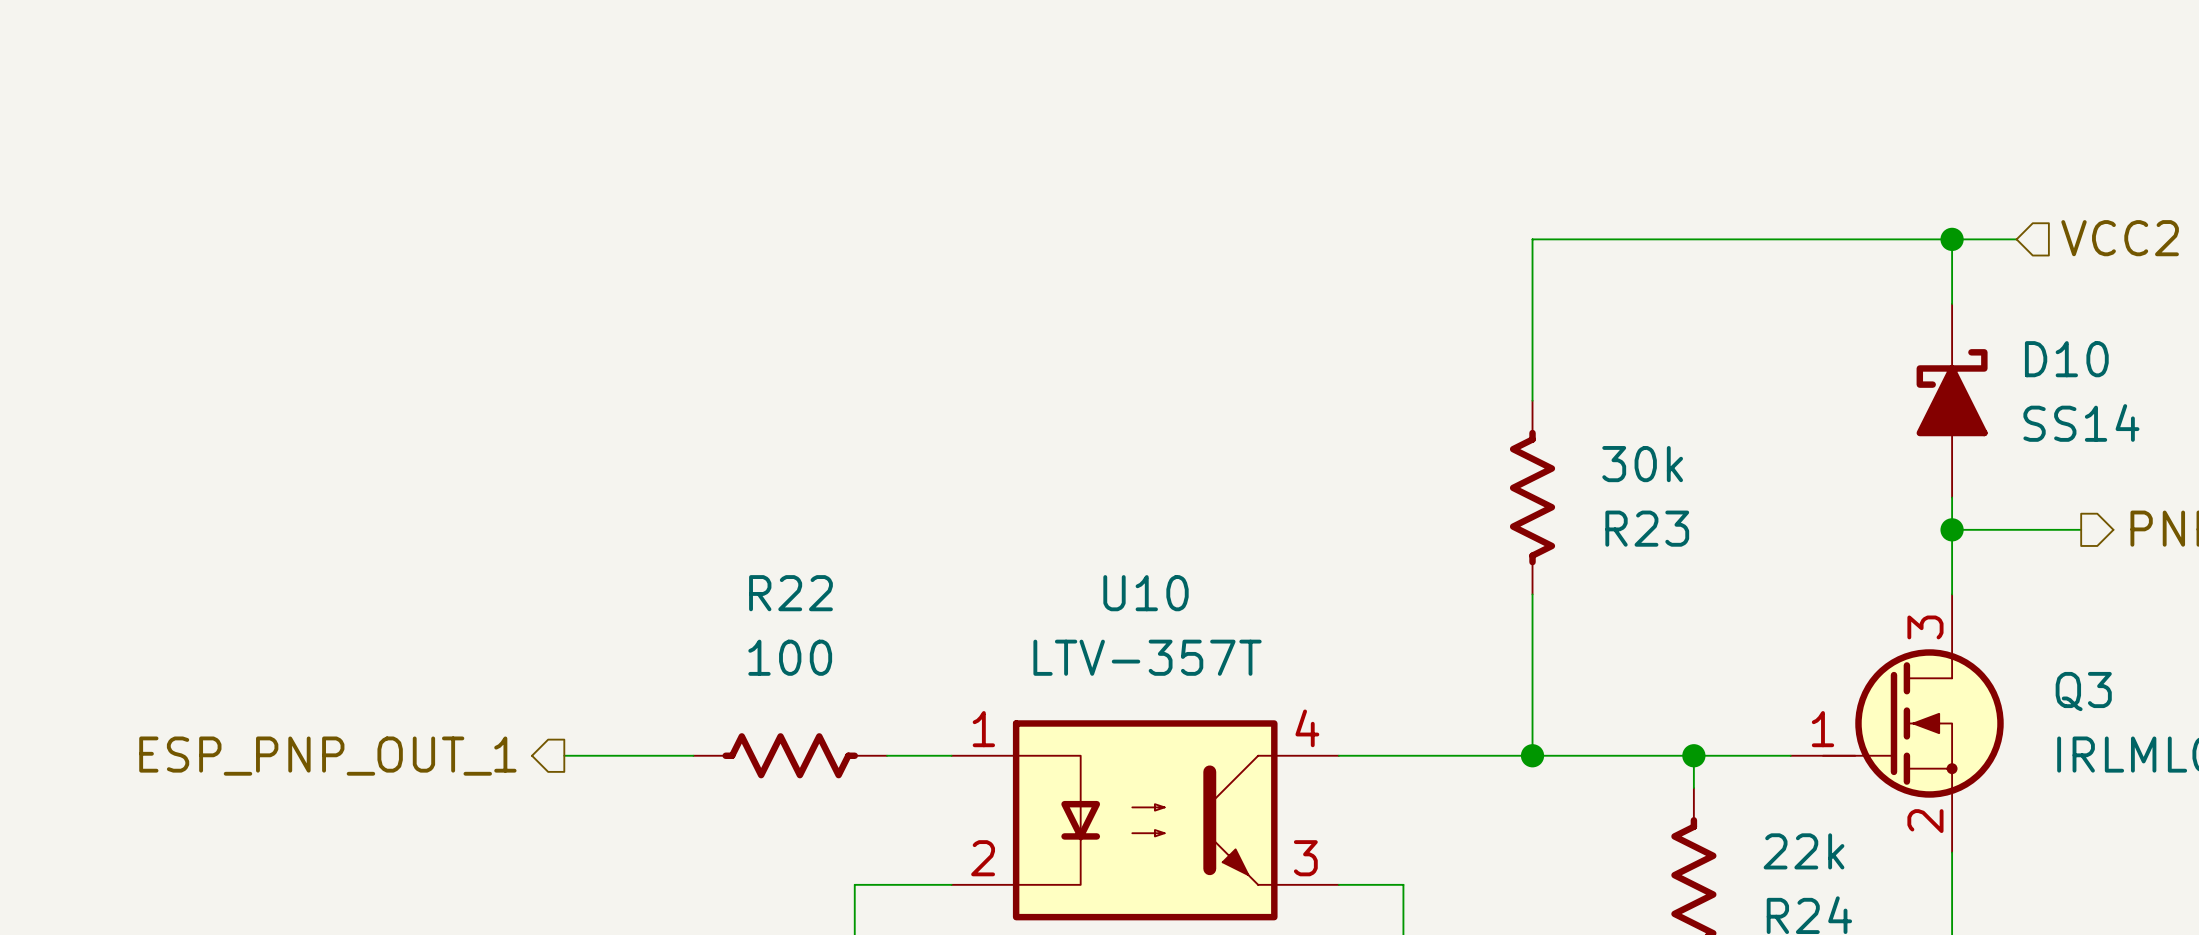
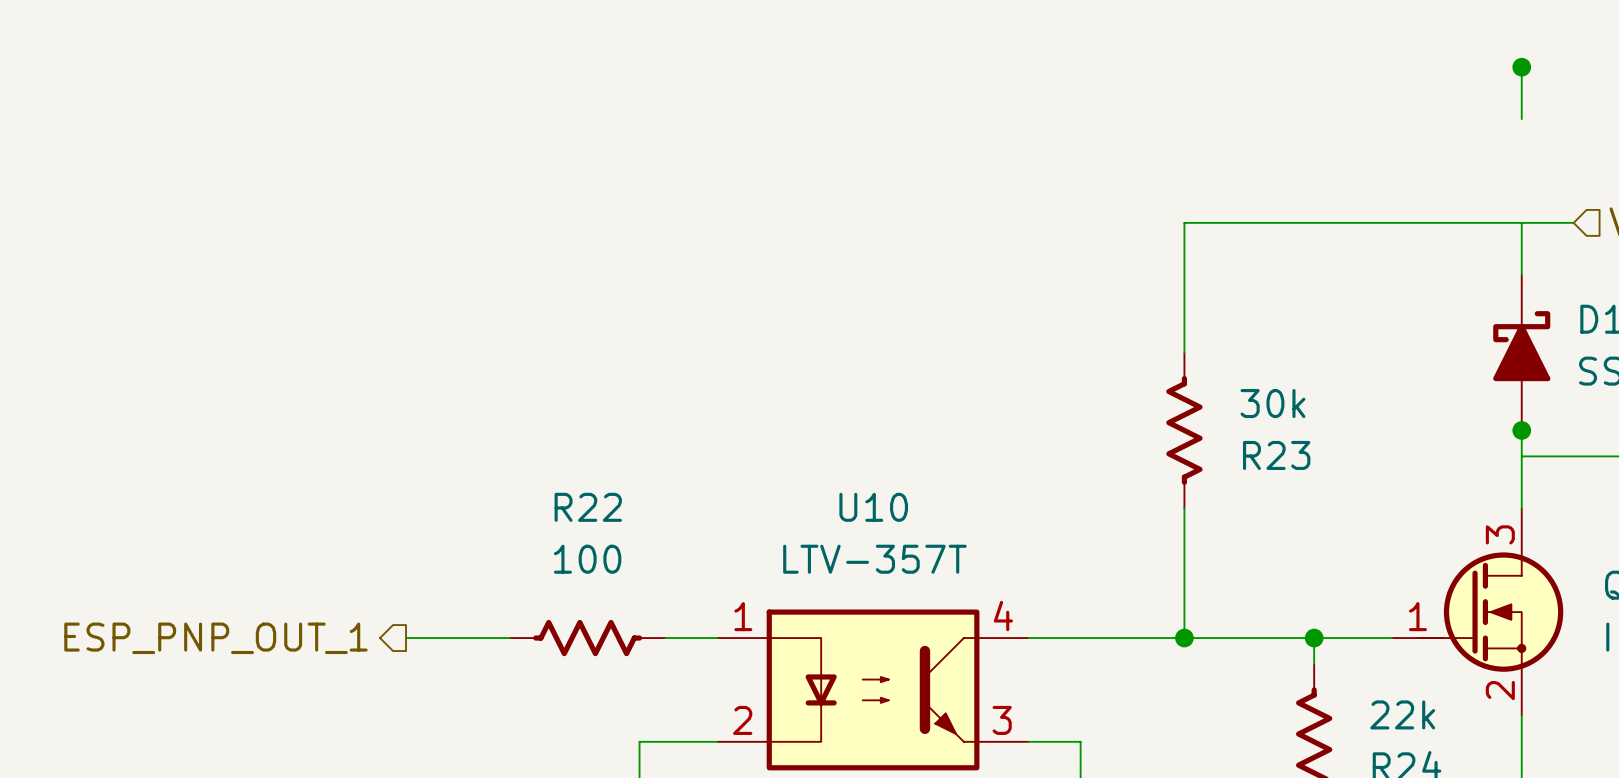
wire: none -> (1521, 67) (1521, 119)
junction: none -> (1521, 67)
junction: (1952, 239) -> none
junction position: (1952, 529) -> (1521, 430)

